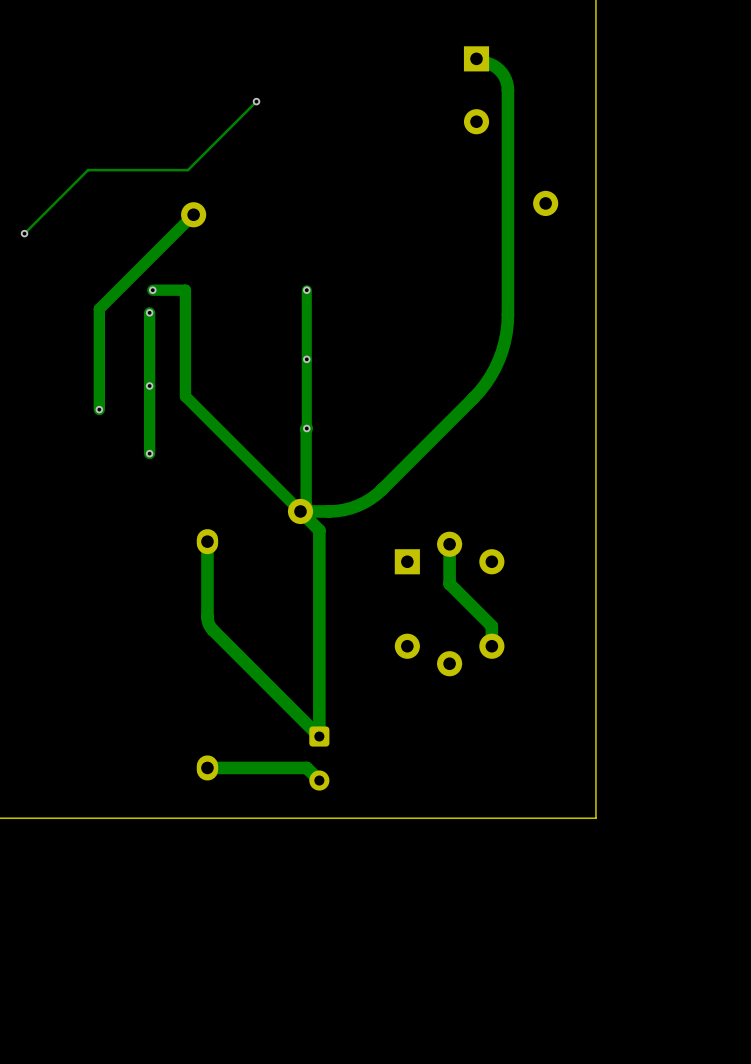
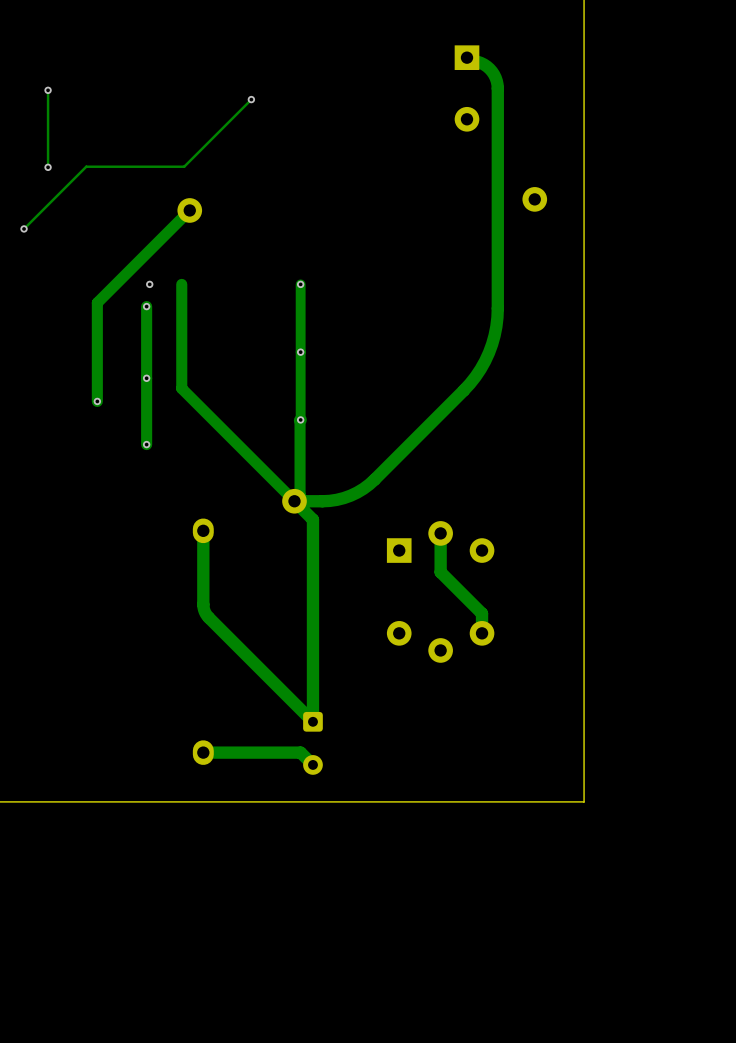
track: none -> (48, 90) (48, 167)
via: none -> (48, 90)
via: none -> (48, 167)
track: (185, 290) (152, 290) -> none

